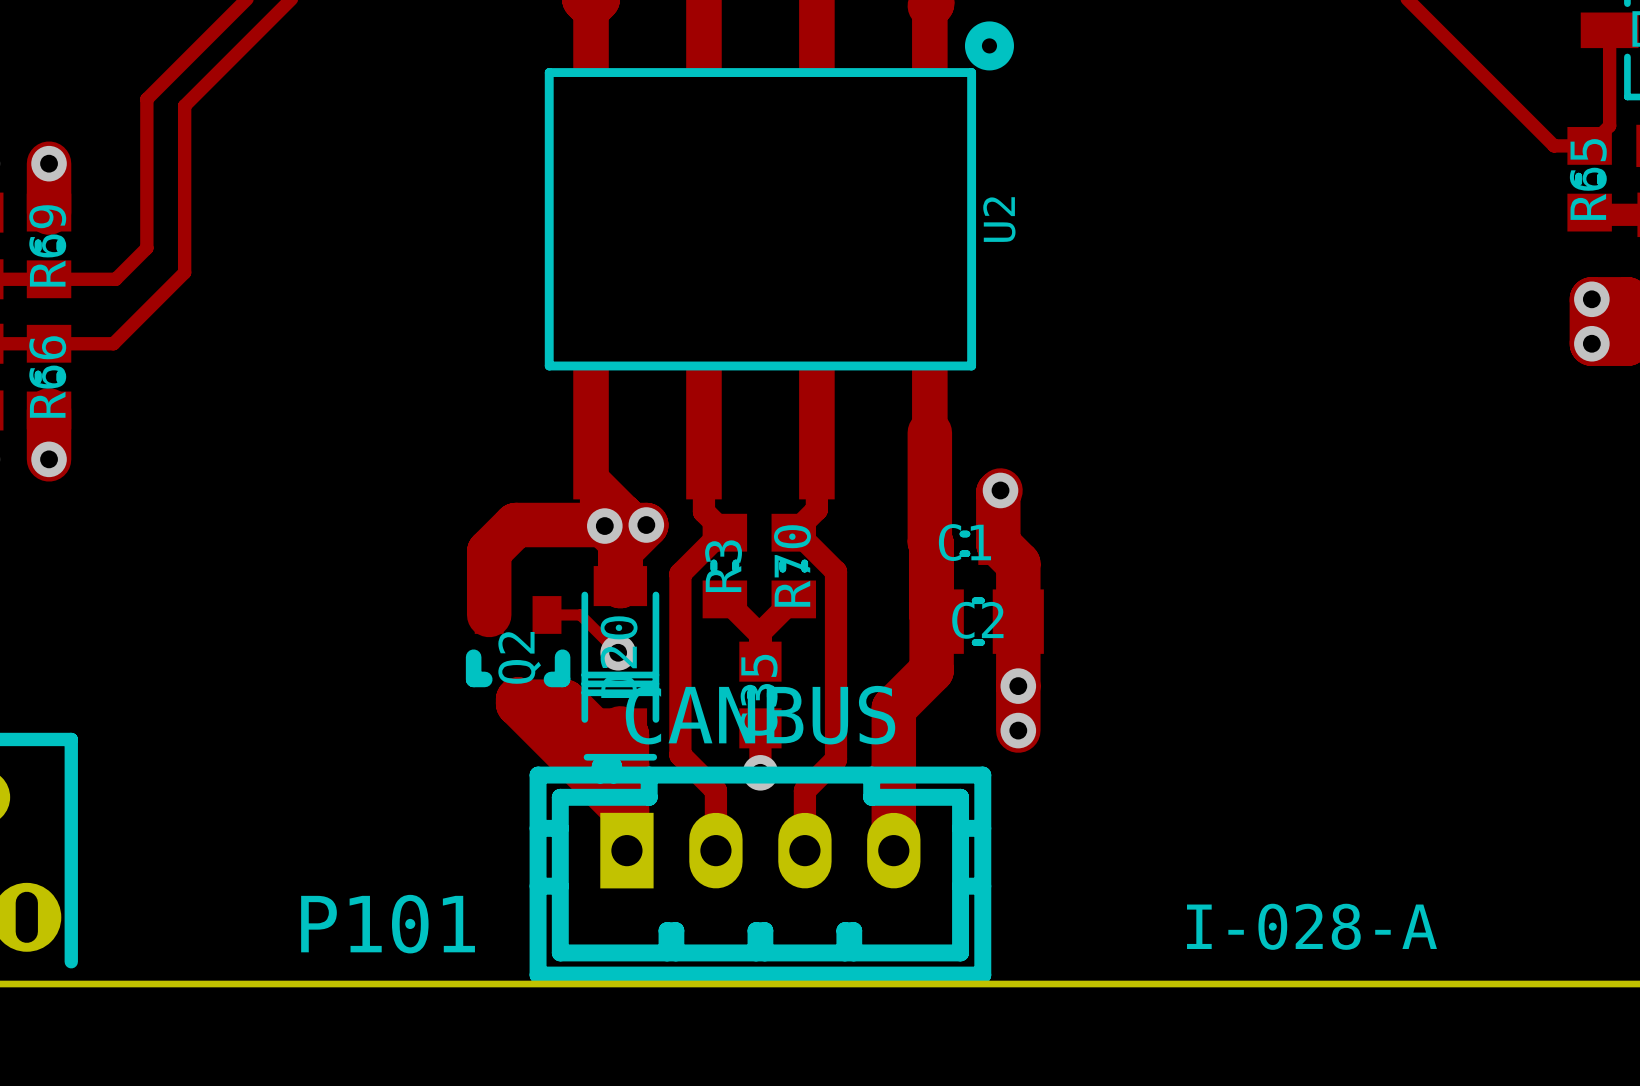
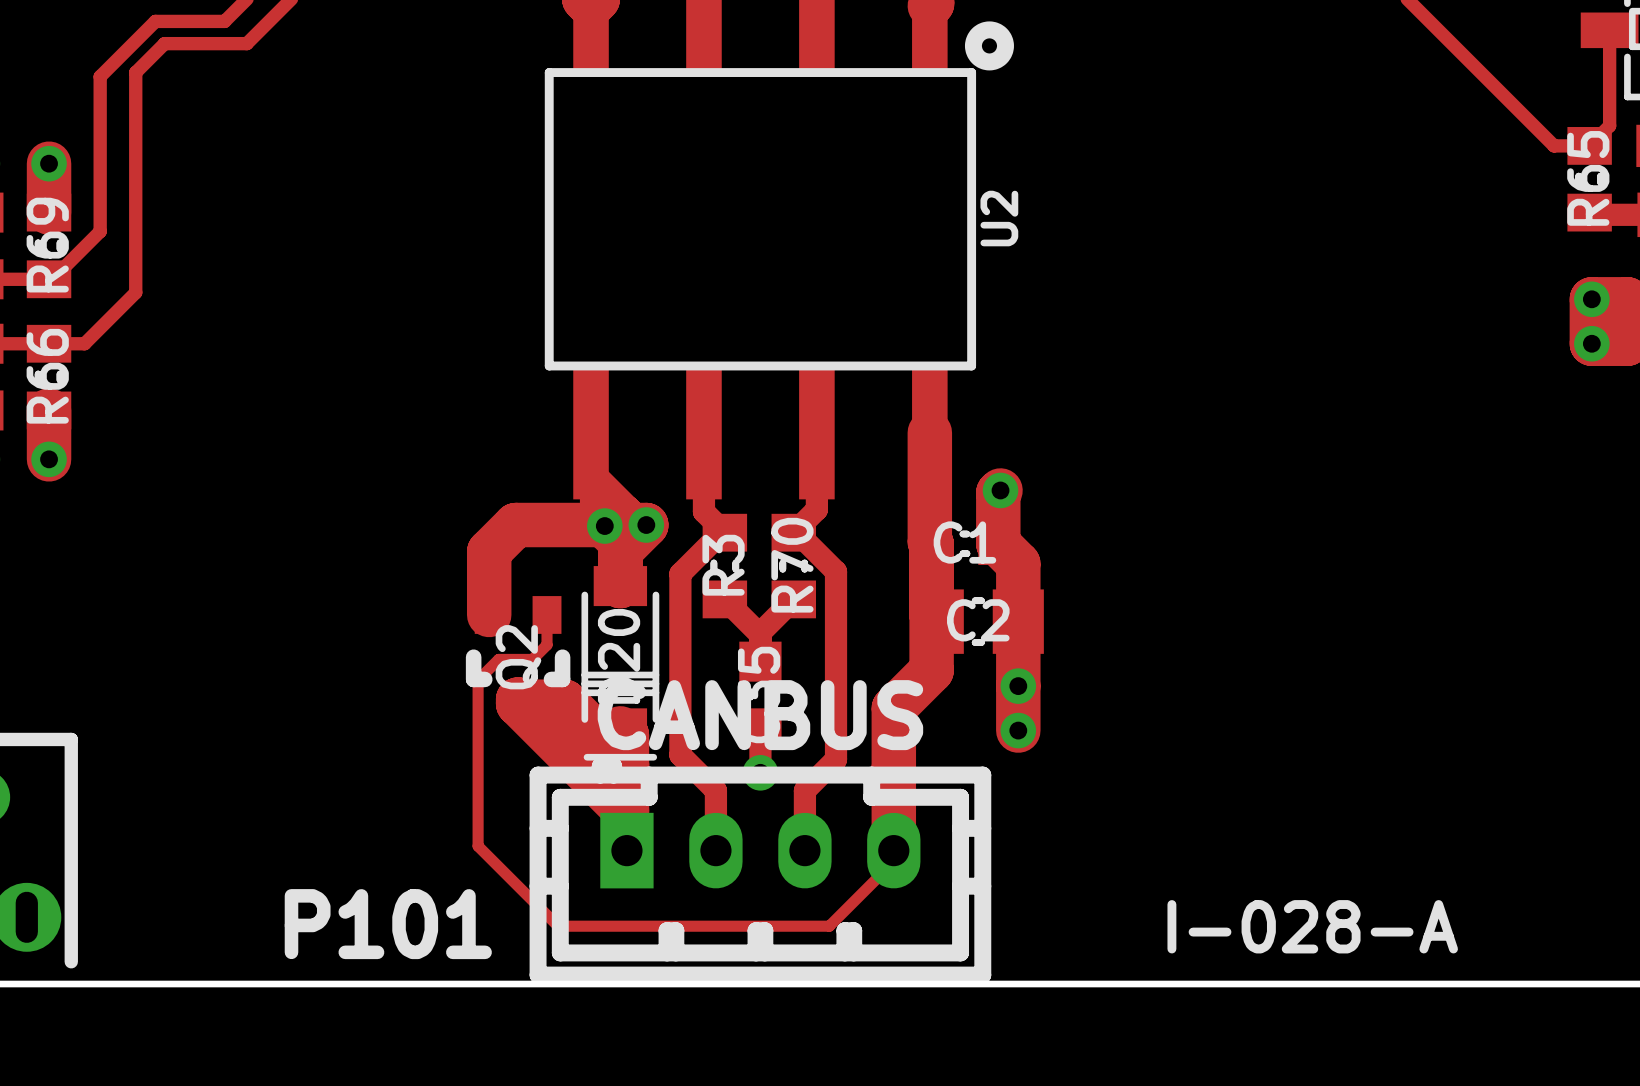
track: (224, 21) (146, 99) (146, 248) (115, 279) (52, 279) -> (224, 21) (155, 21) (100, 76) (100, 231) (52, 279)
track: (246, 43) (184, 105) (184, 272) (113, 343) (84, 343) -> (246, 43) (164, 43) (135, 72) (135, 292) (84, 343)
track: (547, 614) (580, 614) (618, 652) -> (547, 614) (547, 644) (532, 659) (498, 659) (478, 680) (478, 846) (558, 926) (829, 926) (893, 861) (893, 850)
via: (618, 652) -> none

